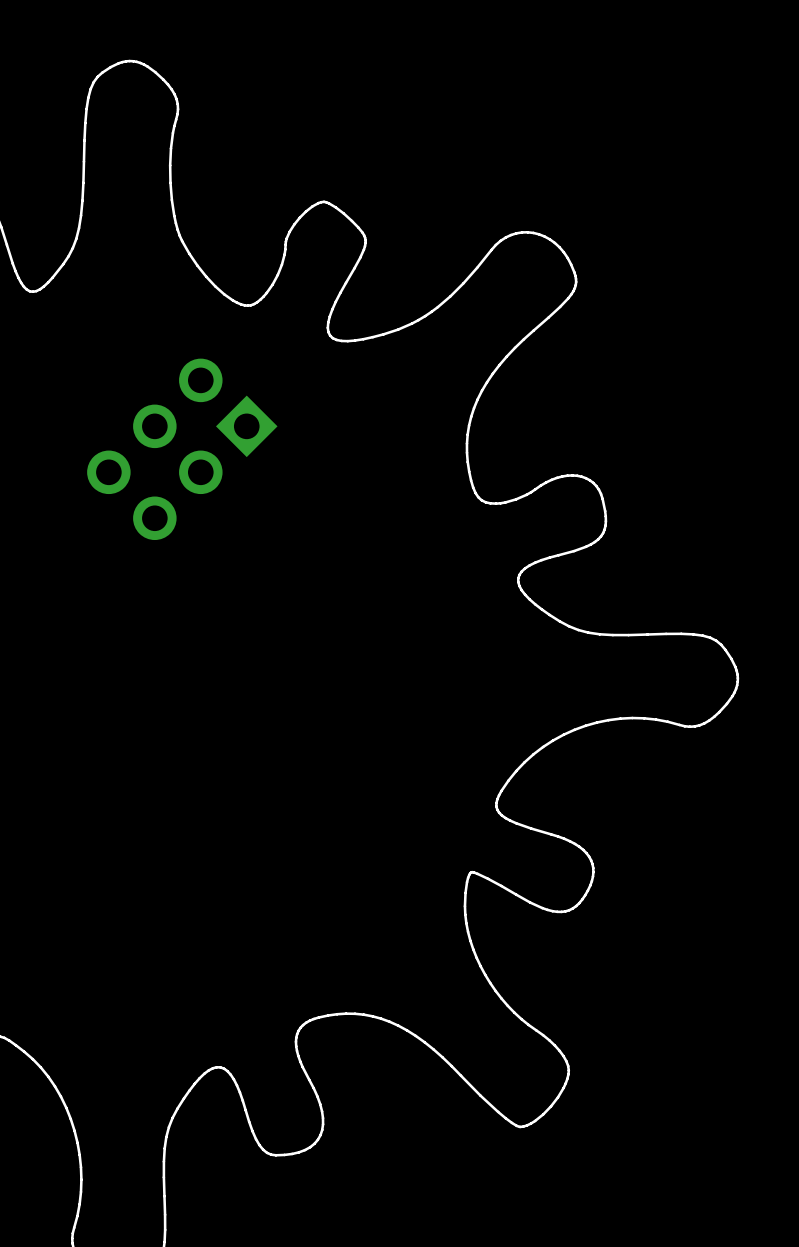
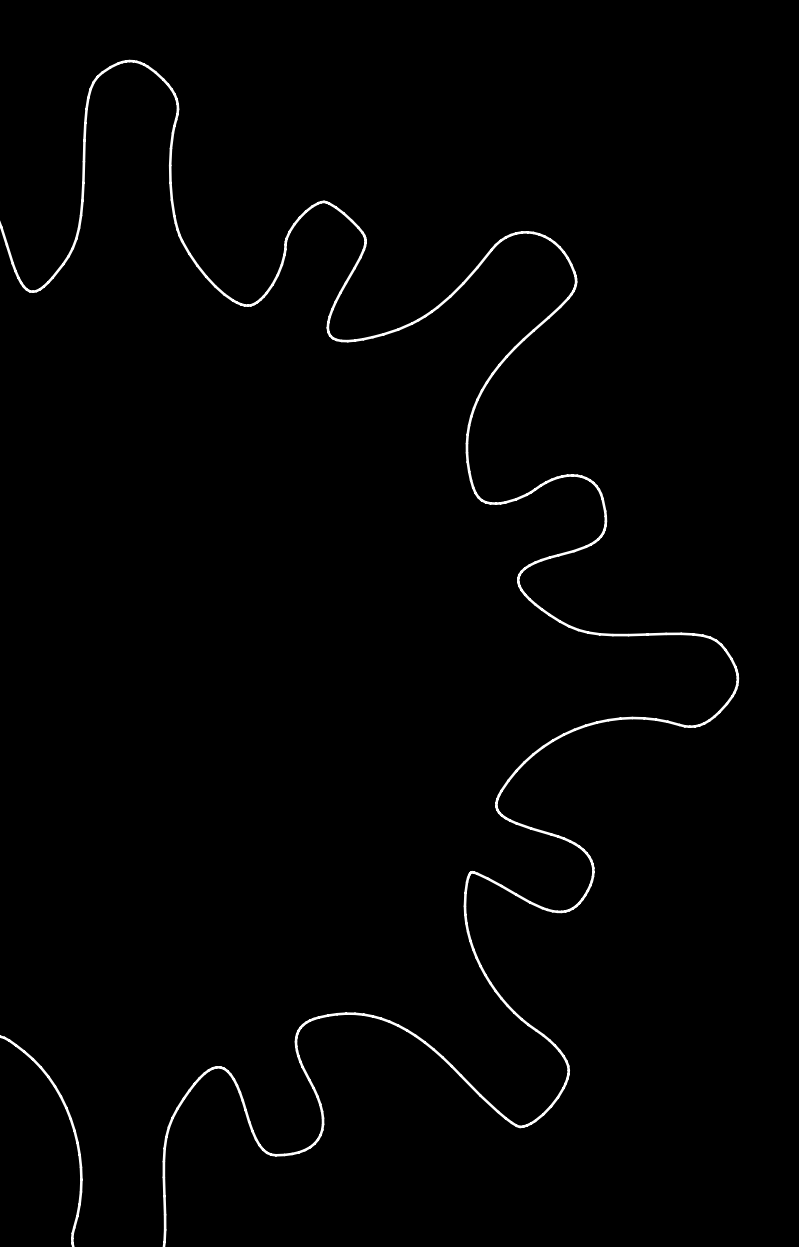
part: (182, 449) -> none

